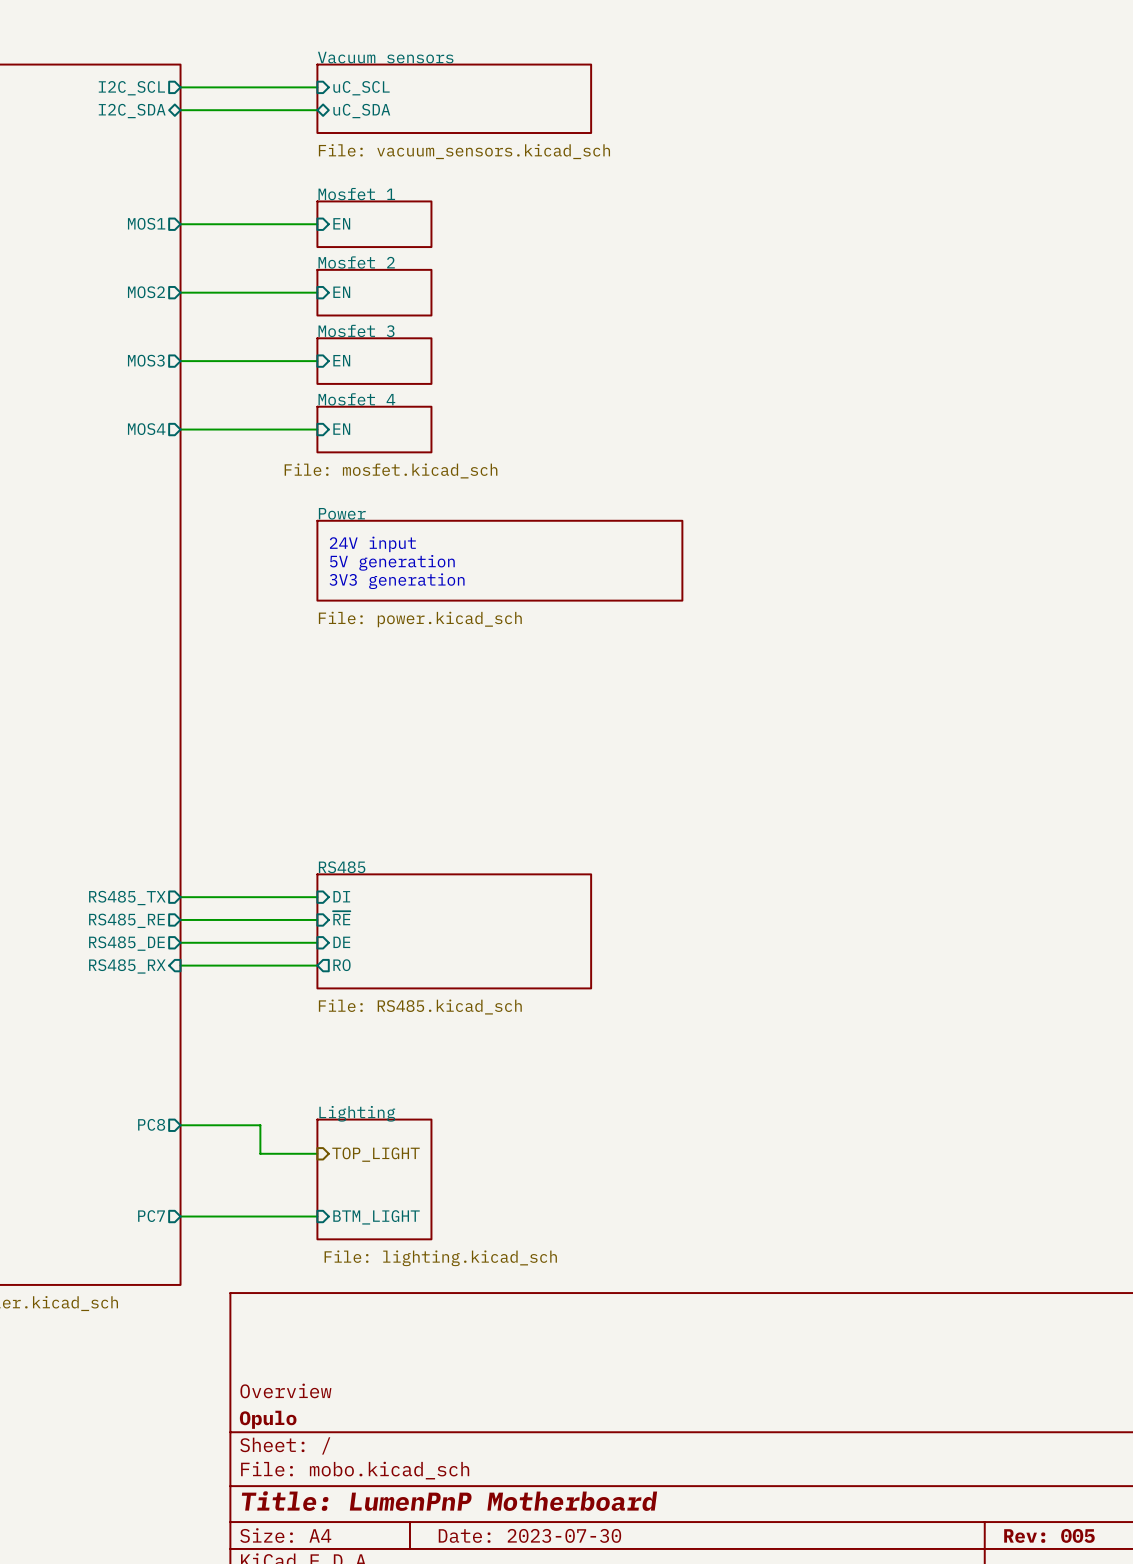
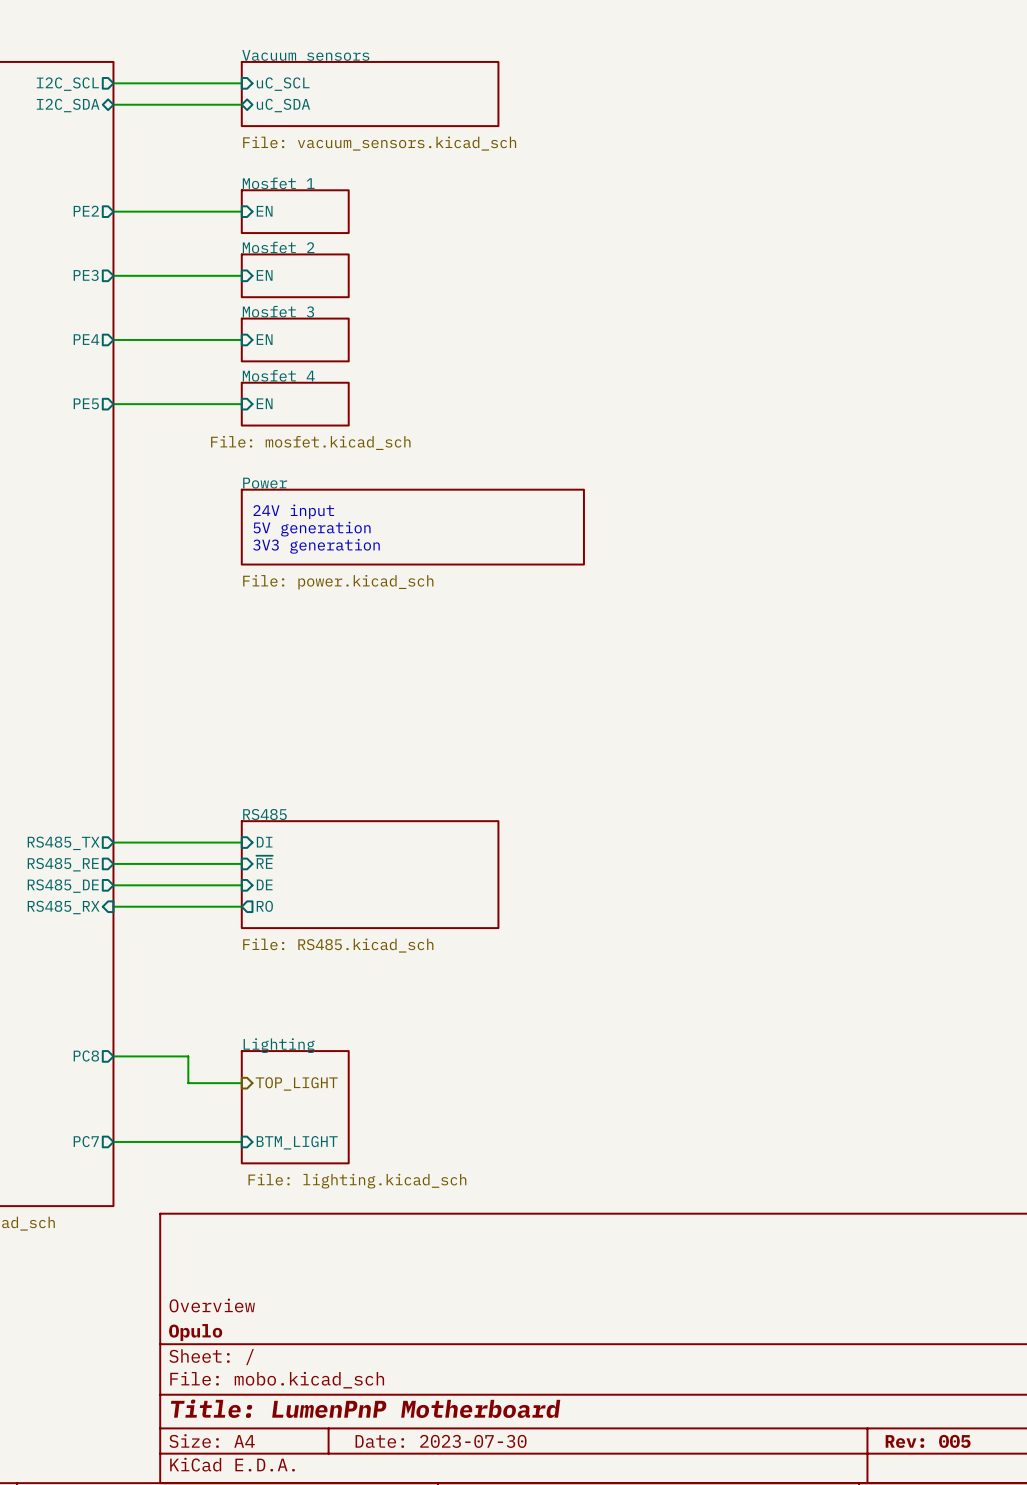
sheet pin: MOS1 (146, 223) -> PE2 (86, 211)
sheet pin: MOS2 (146, 292) -> PE3 (86, 275)
sheet pin: MOS3 (146, 360) -> PE4 (86, 339)
sheet pin: MOS4 (146, 429) -> PE5 (86, 403)

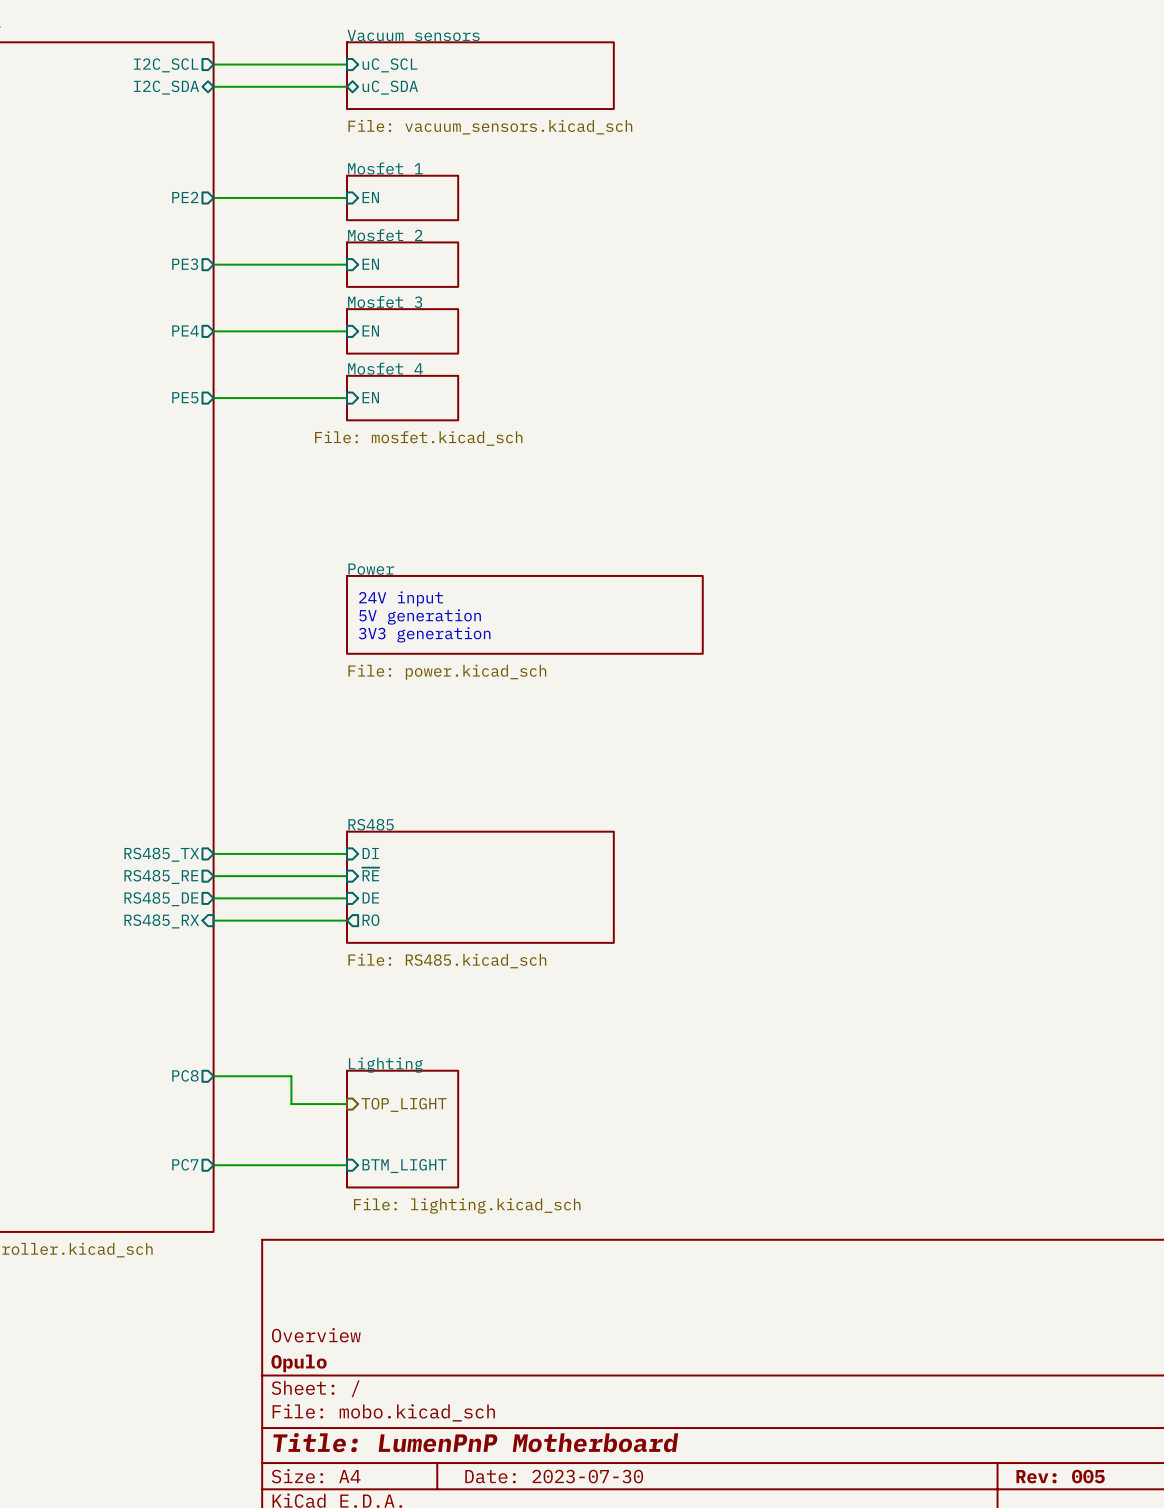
text position: 24V input (293, 511) -> 24V input (401, 598)
sheet Power position: (412, 527) -> (524, 614)
text position: 5V generation (312, 529) -> 5V generation (420, 616)
text position: 3V3 generation (316, 546) -> 3V3 generation (424, 634)

